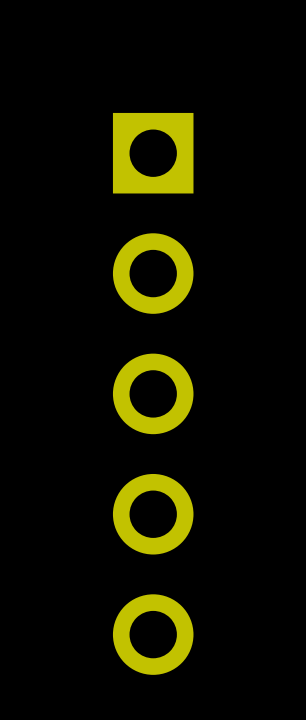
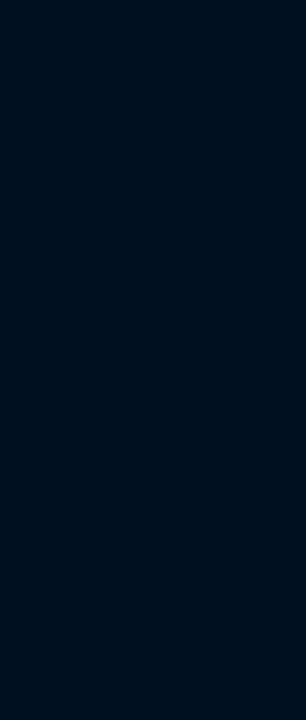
part: (153, 393) -> none

